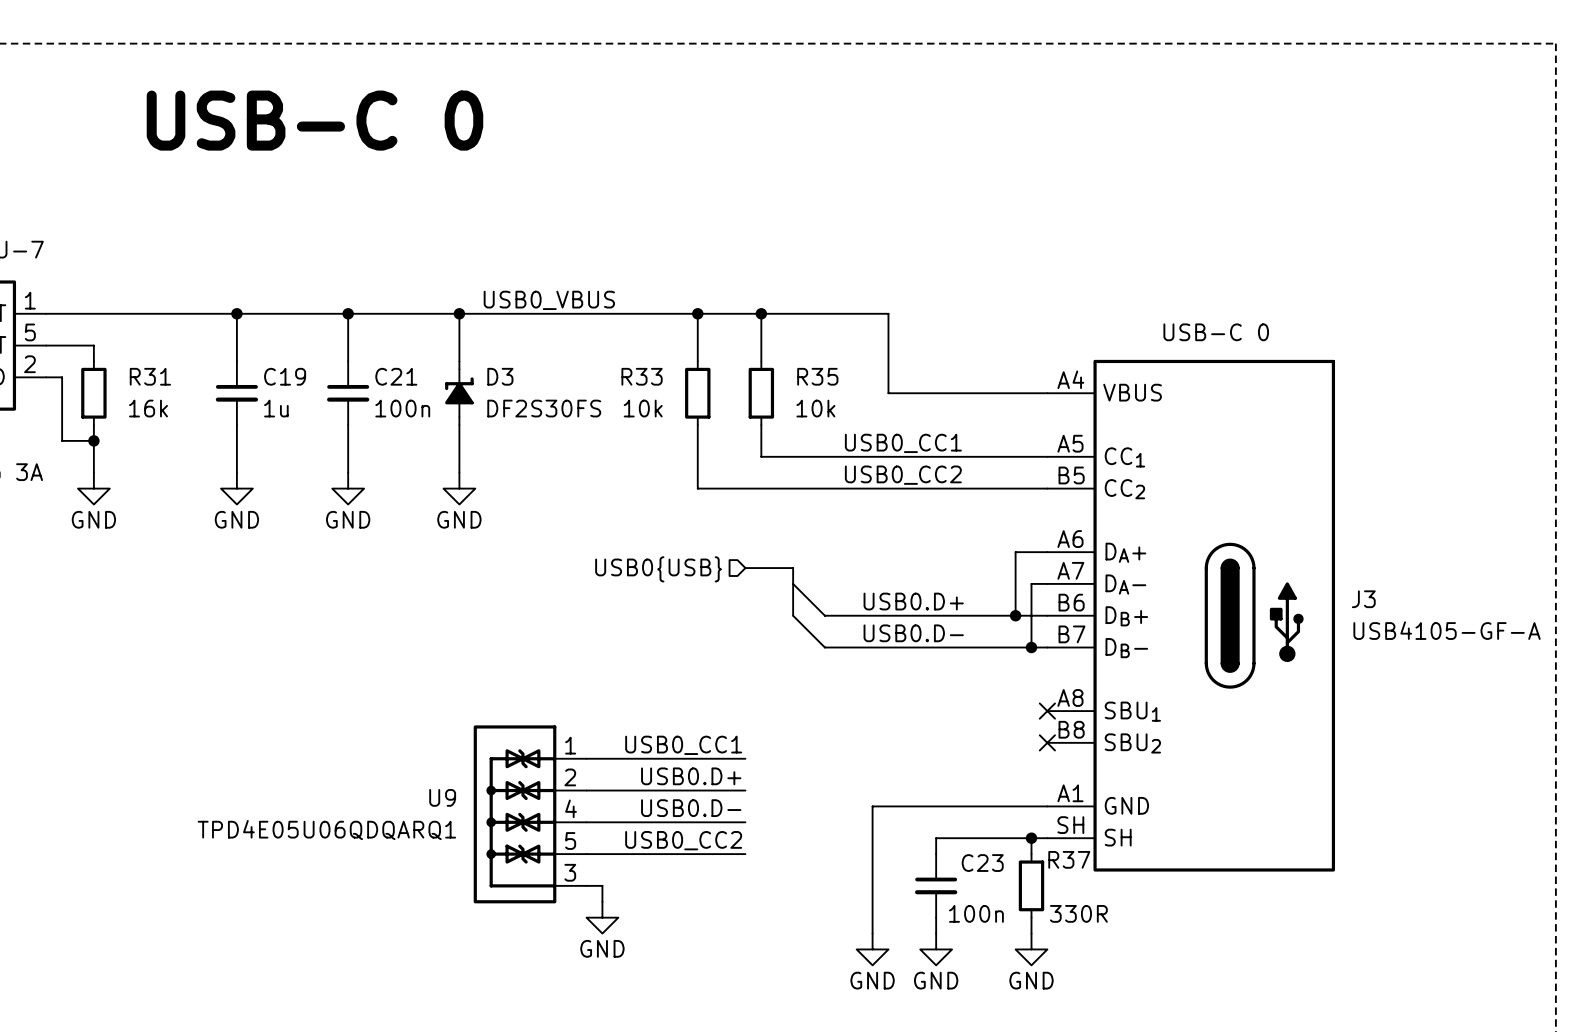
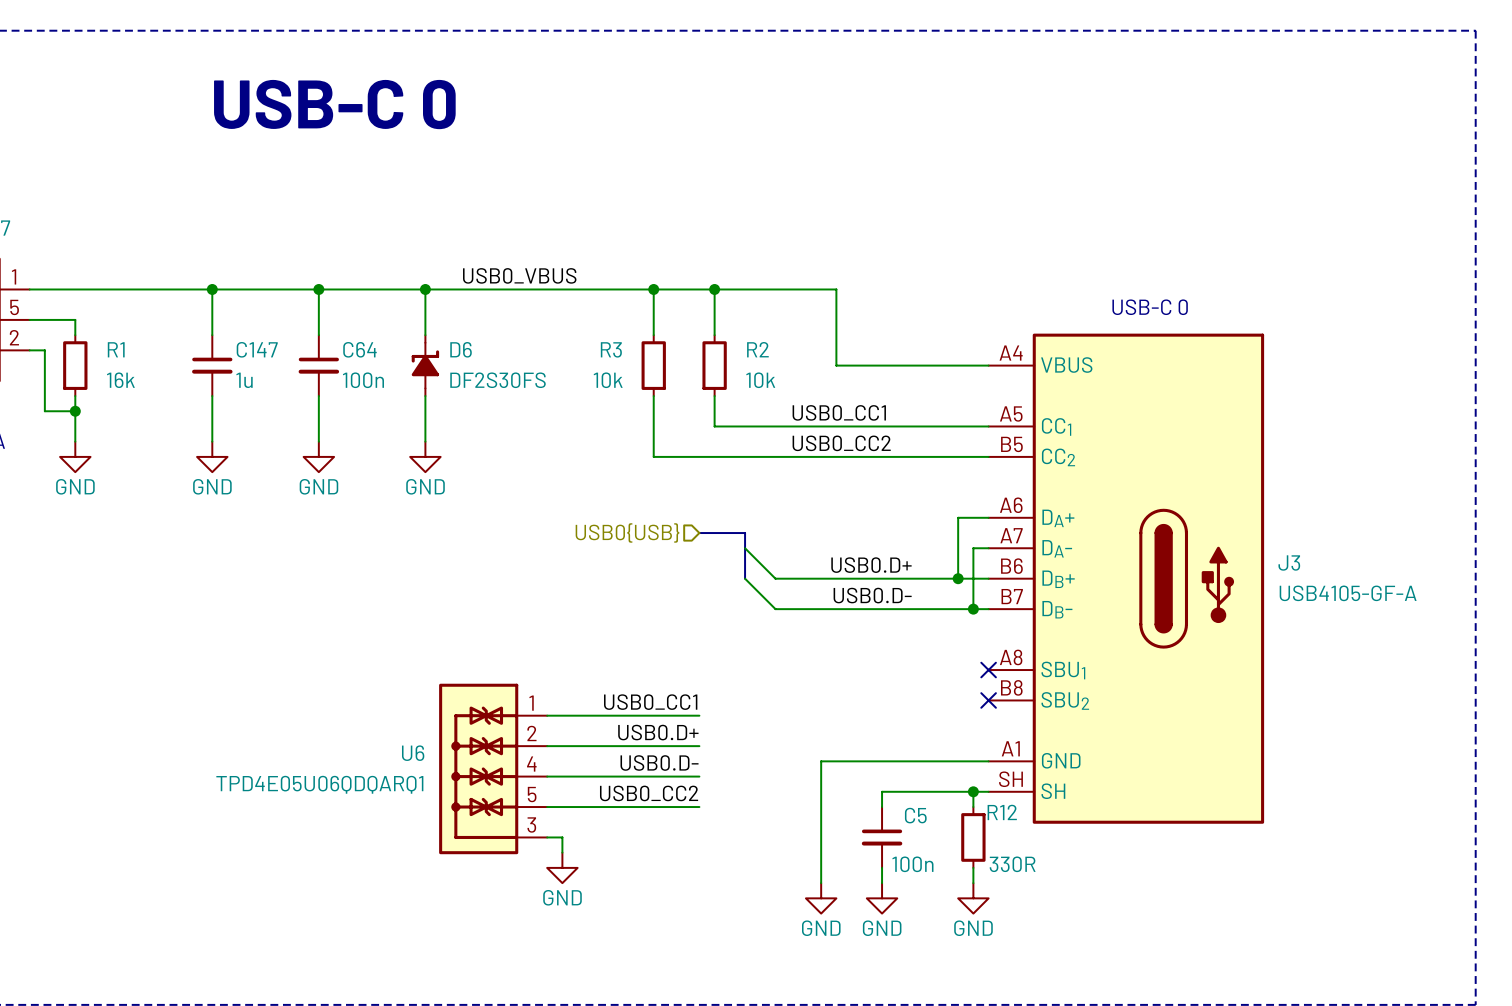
R31 name: R31 (150, 376) -> R1 (116, 349)
C19 name: C19 (285, 376) -> C147 (257, 349)
C21 name: C21 (396, 376) -> C64 (359, 349)
D3 name: D3 (500, 376) -> D6 (461, 349)
R33 name: R33 (642, 376) -> R3 (611, 349)
R35 name: R35 (817, 376) -> R2 (757, 349)
U9 name: U9 (442, 797) -> U6 (413, 753)
R37 name: R37 (1069, 859) -> R12 (1002, 812)
C23 name: C23 (982, 863) -> C5 (915, 815)

